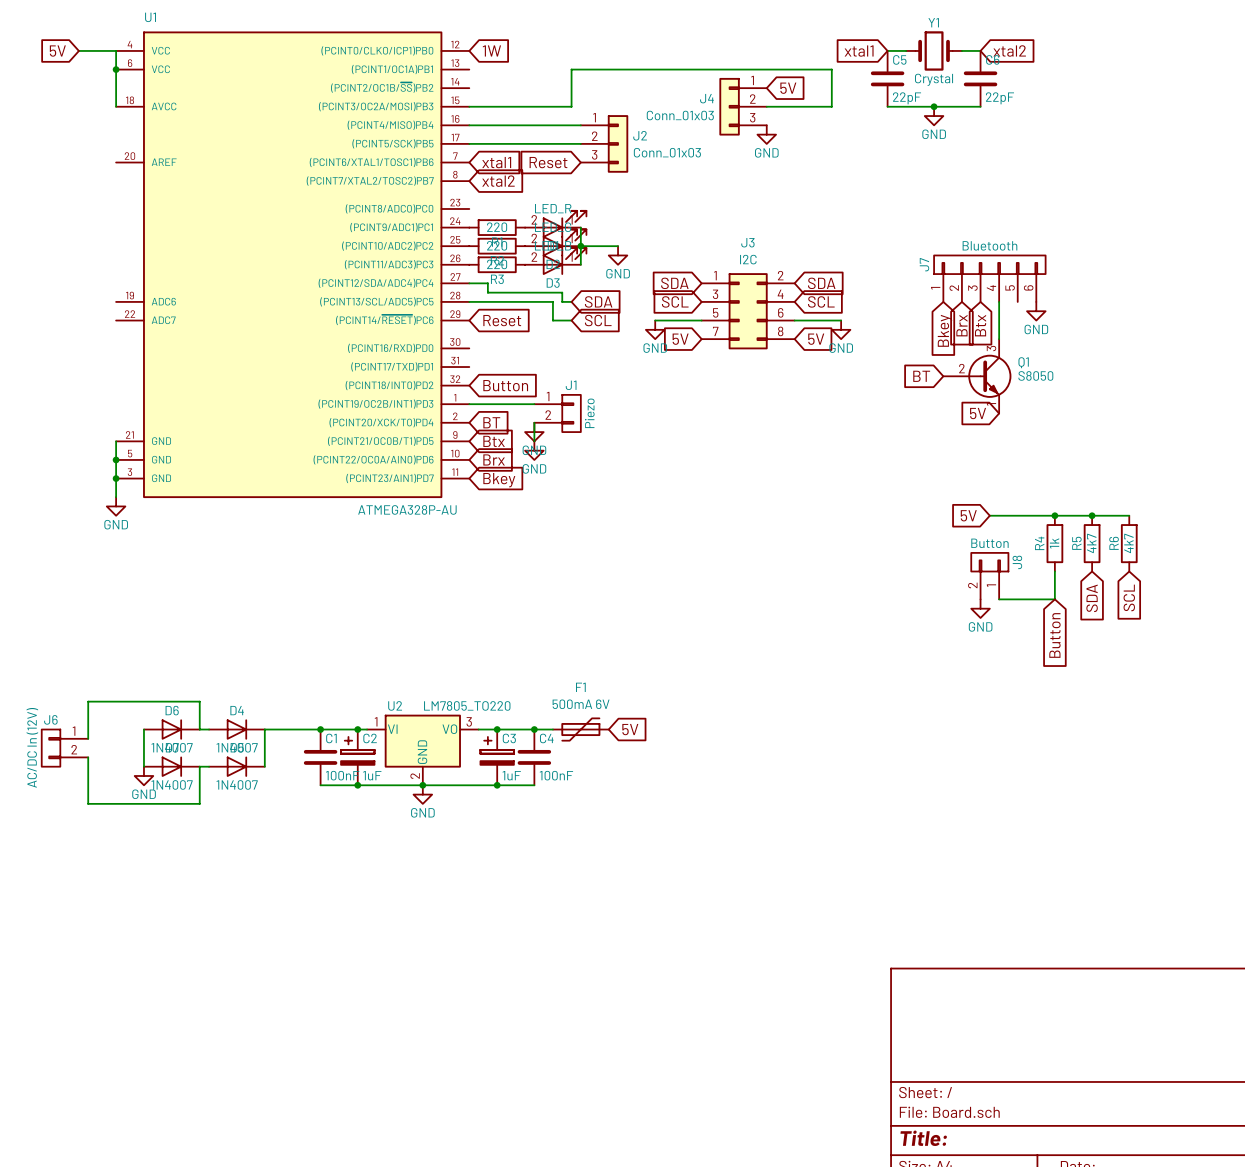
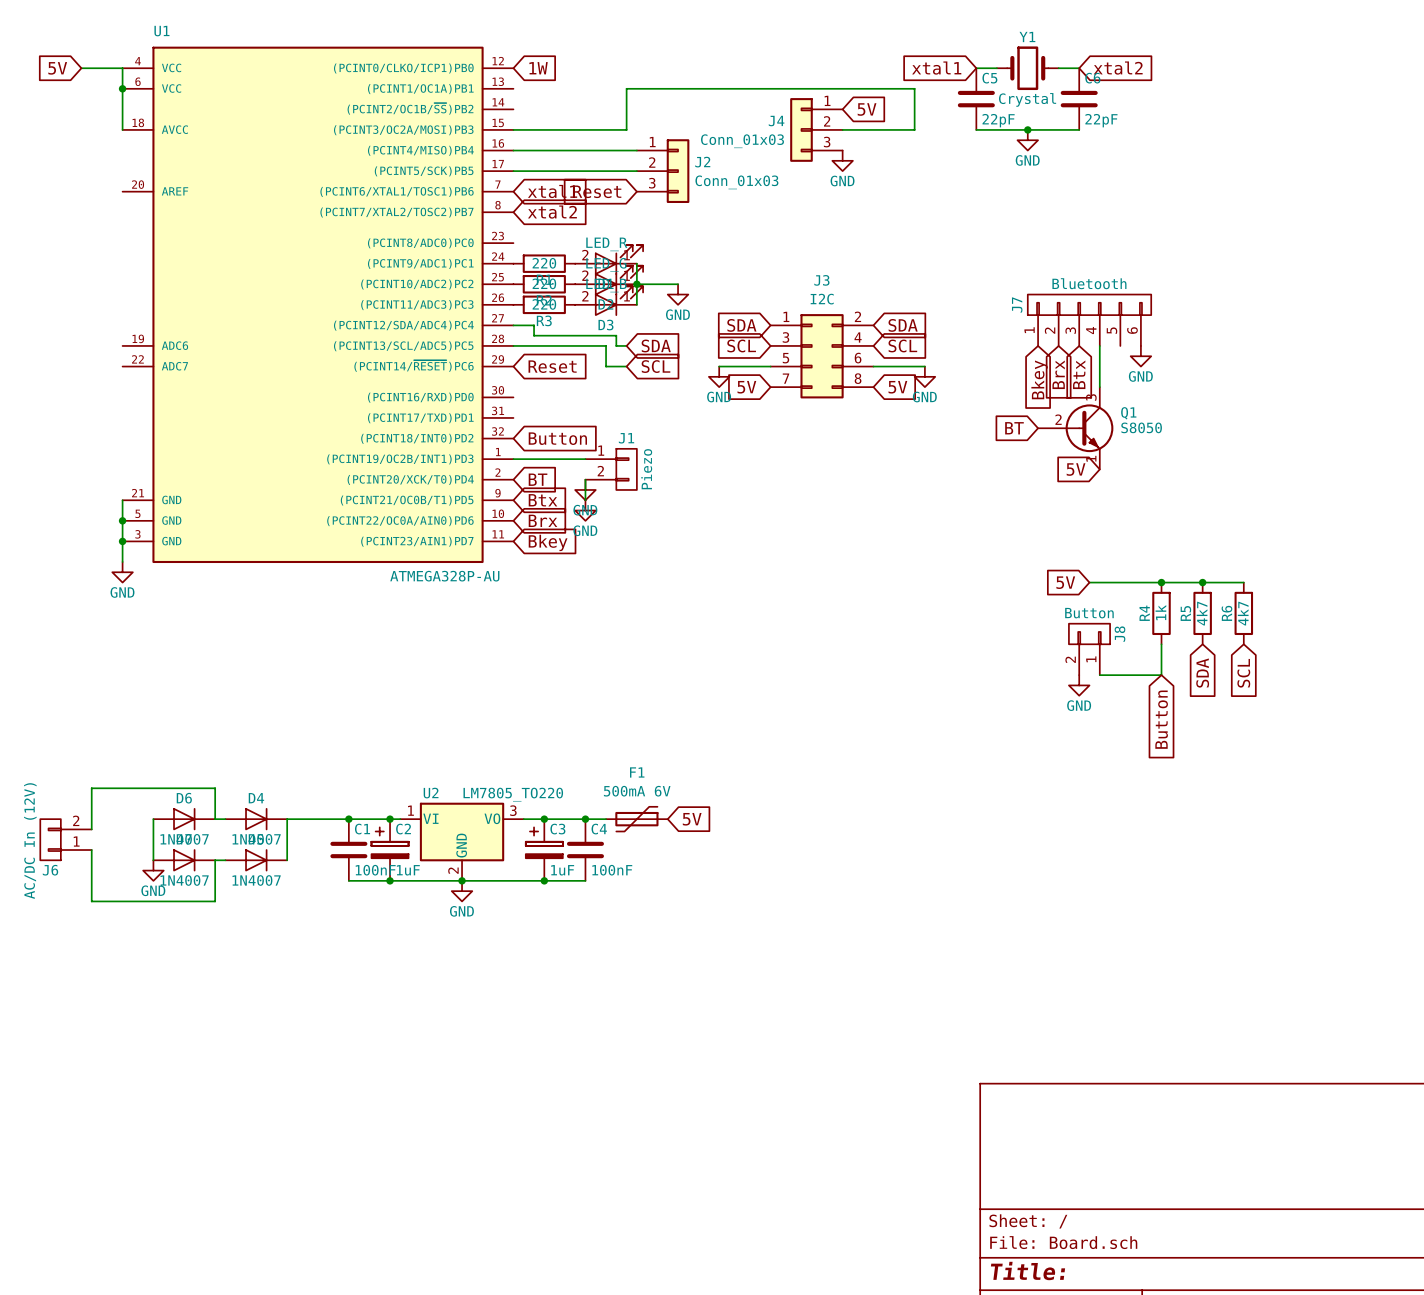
J6 flip: as is (51, 748) -> up-down (50, 839)

